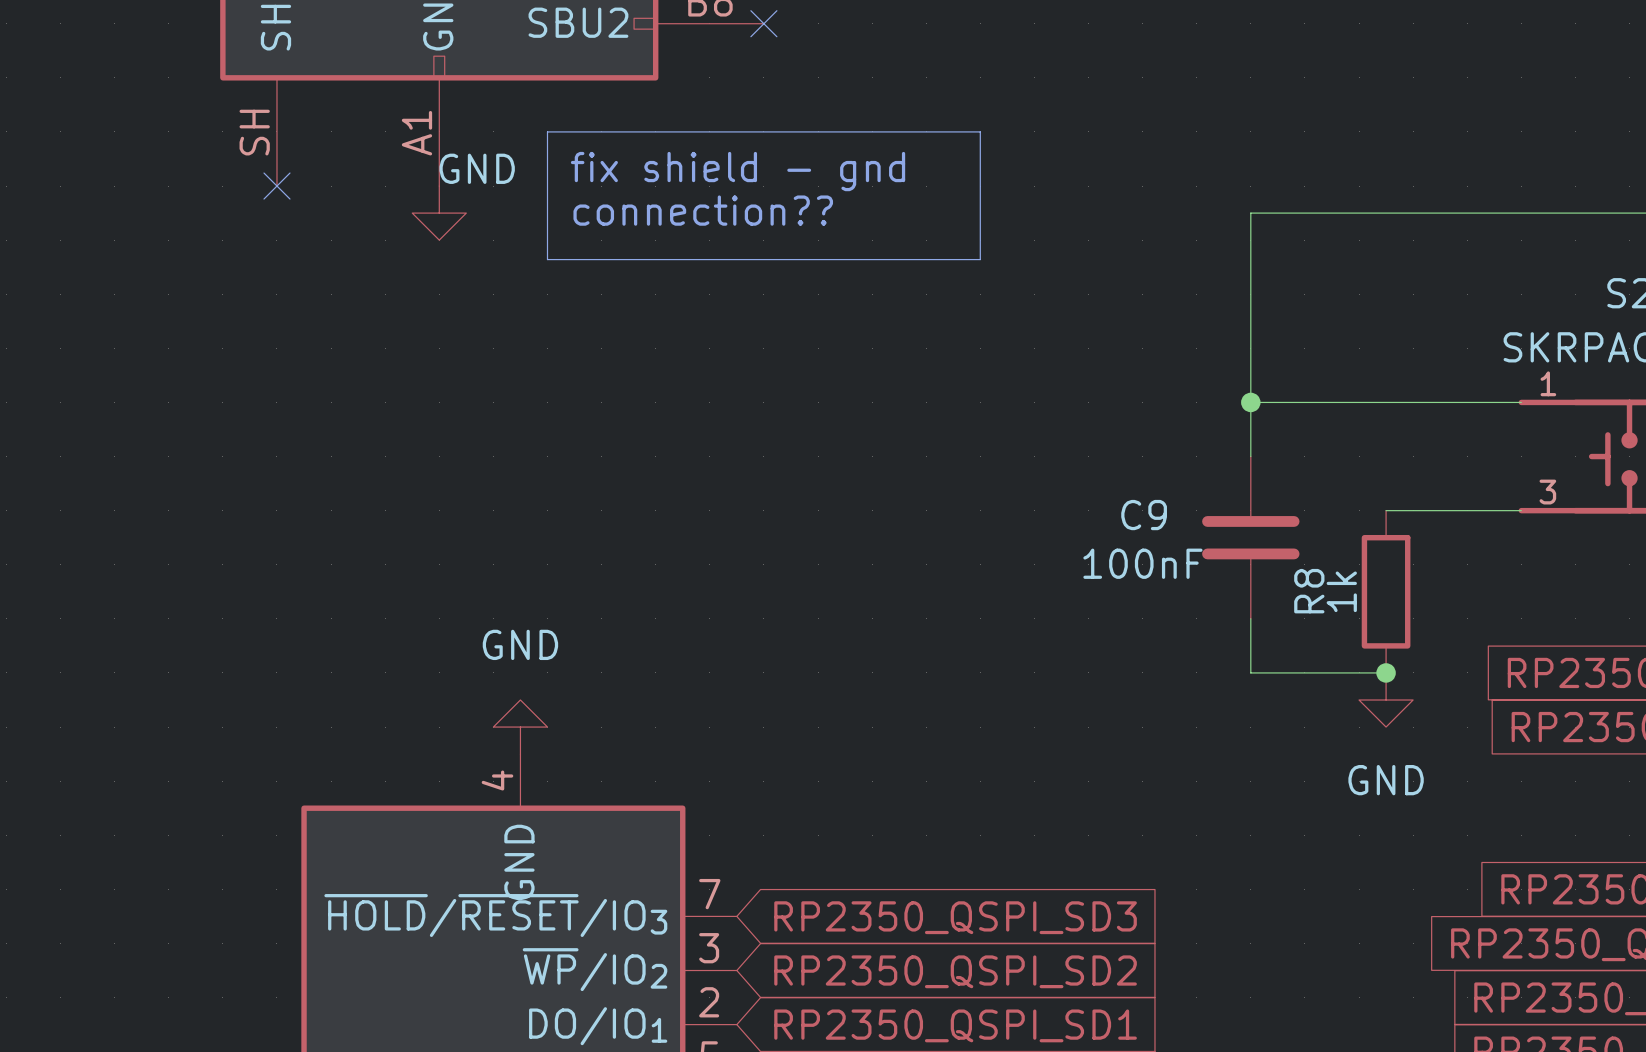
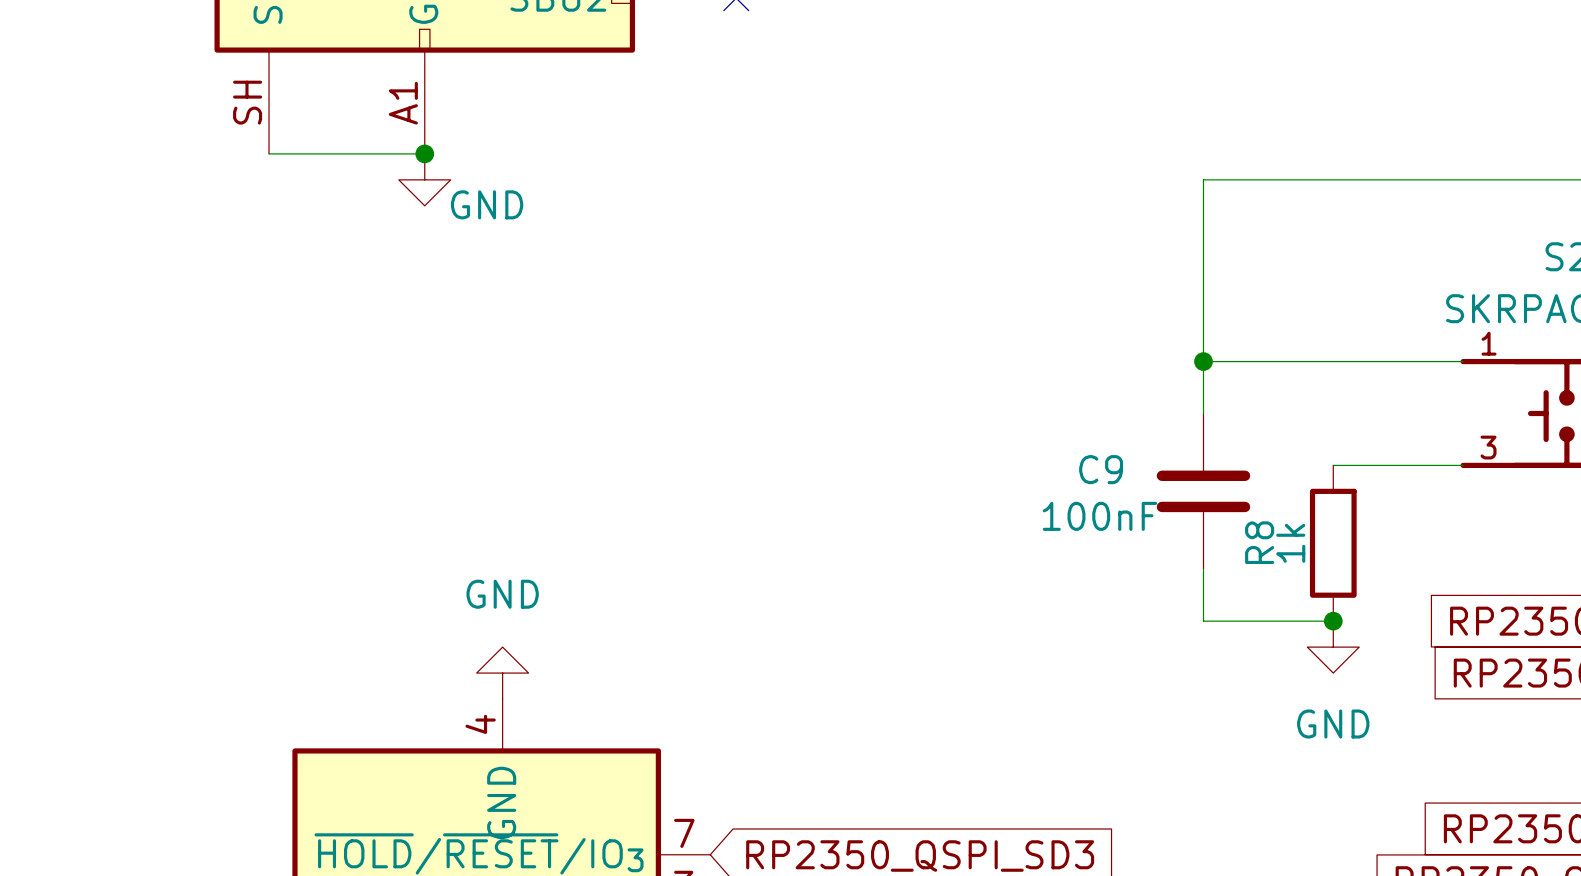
line: (547, 131) (980, 131) (980, 259) (547, 259) (547, 131) -> none
power symbol text position: GND (477, 168) -> GND (487, 204)
text: fix shield - gnd (738, 171) -> none
wire: none -> (269, 153) (424, 153)
no-connect mark: (276, 186) -> none
junction: none -> (424, 153)
text: connection?? (703, 210) -> none

